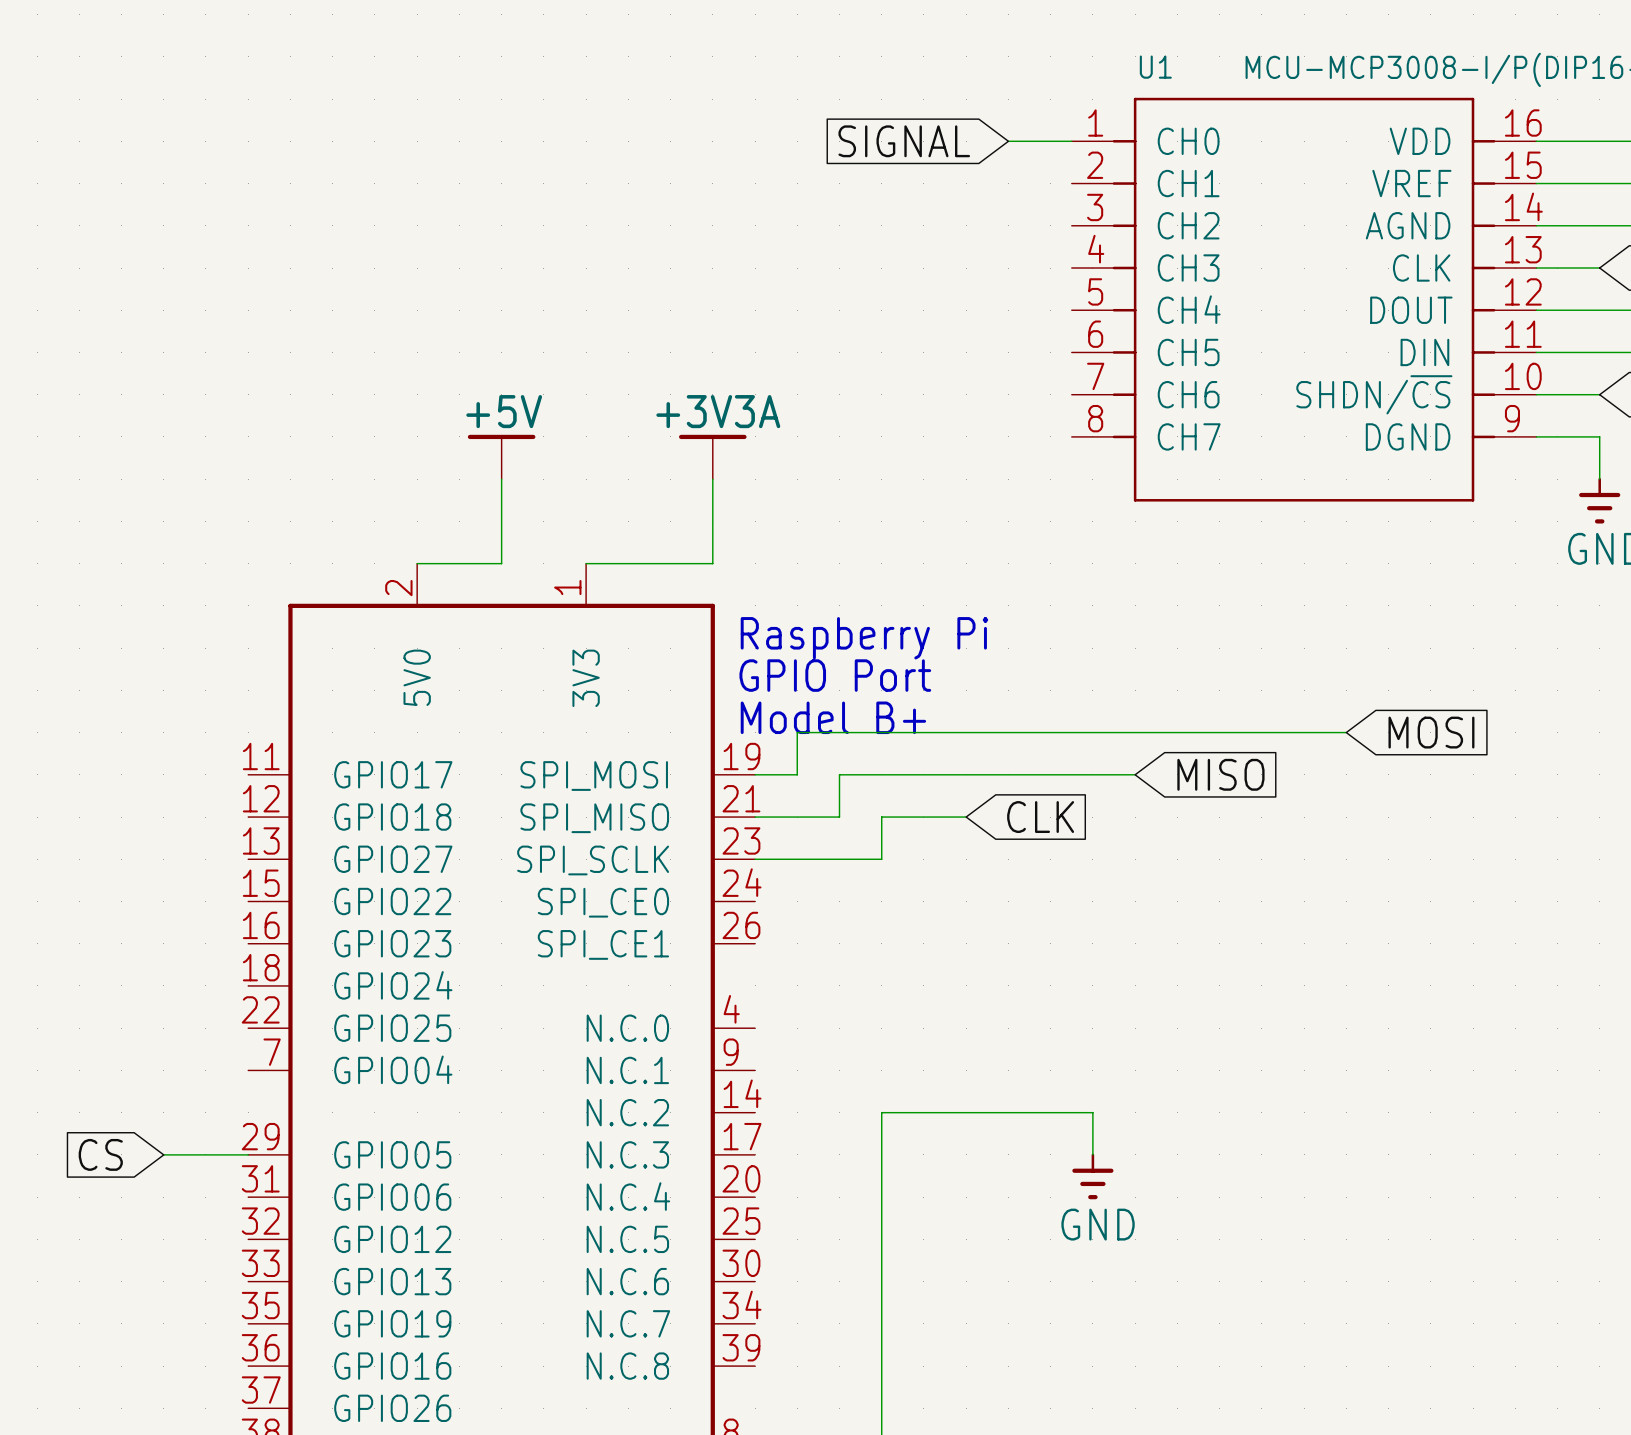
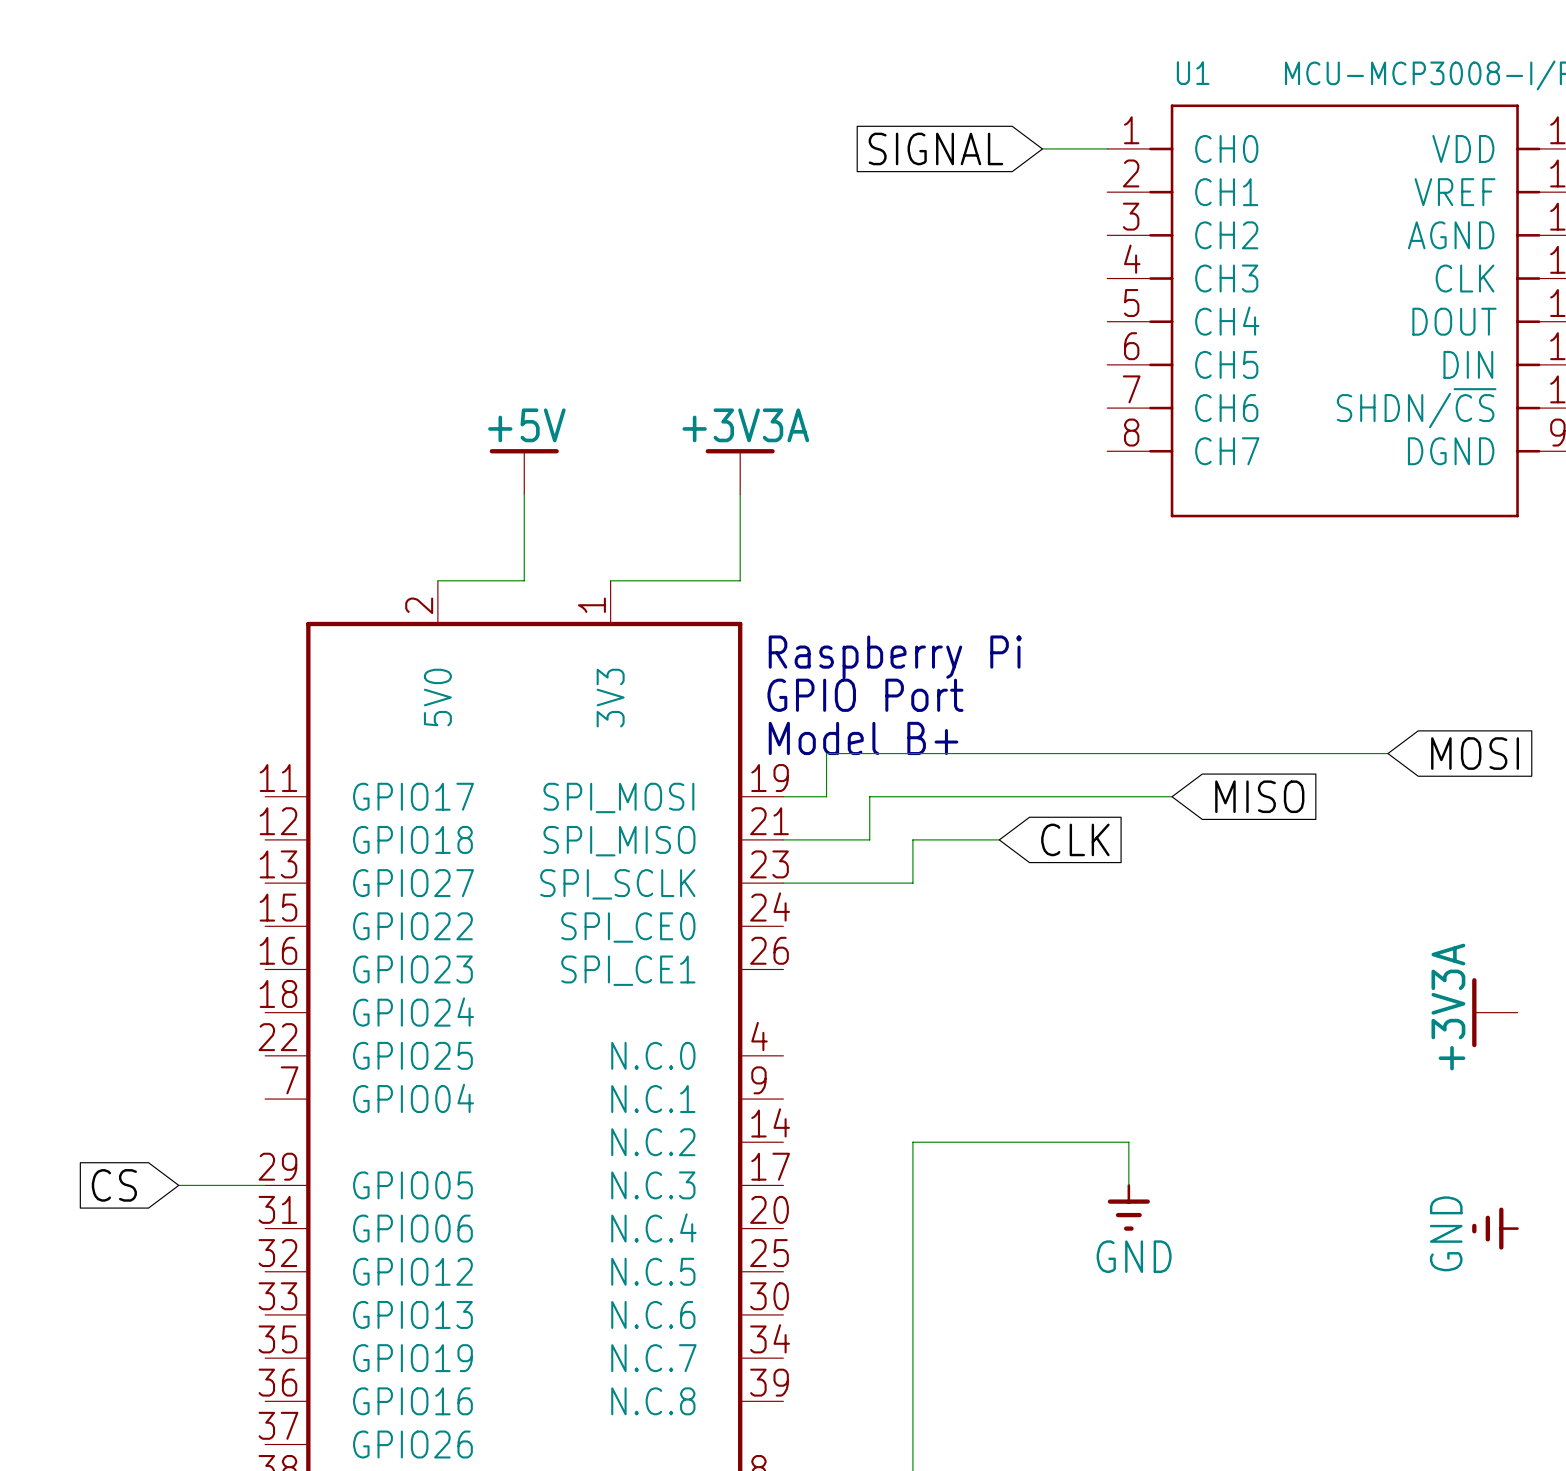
power symbol: none -> +3V3A (1494, 1012)
power symbol: none -> GND (1495, 1228)

